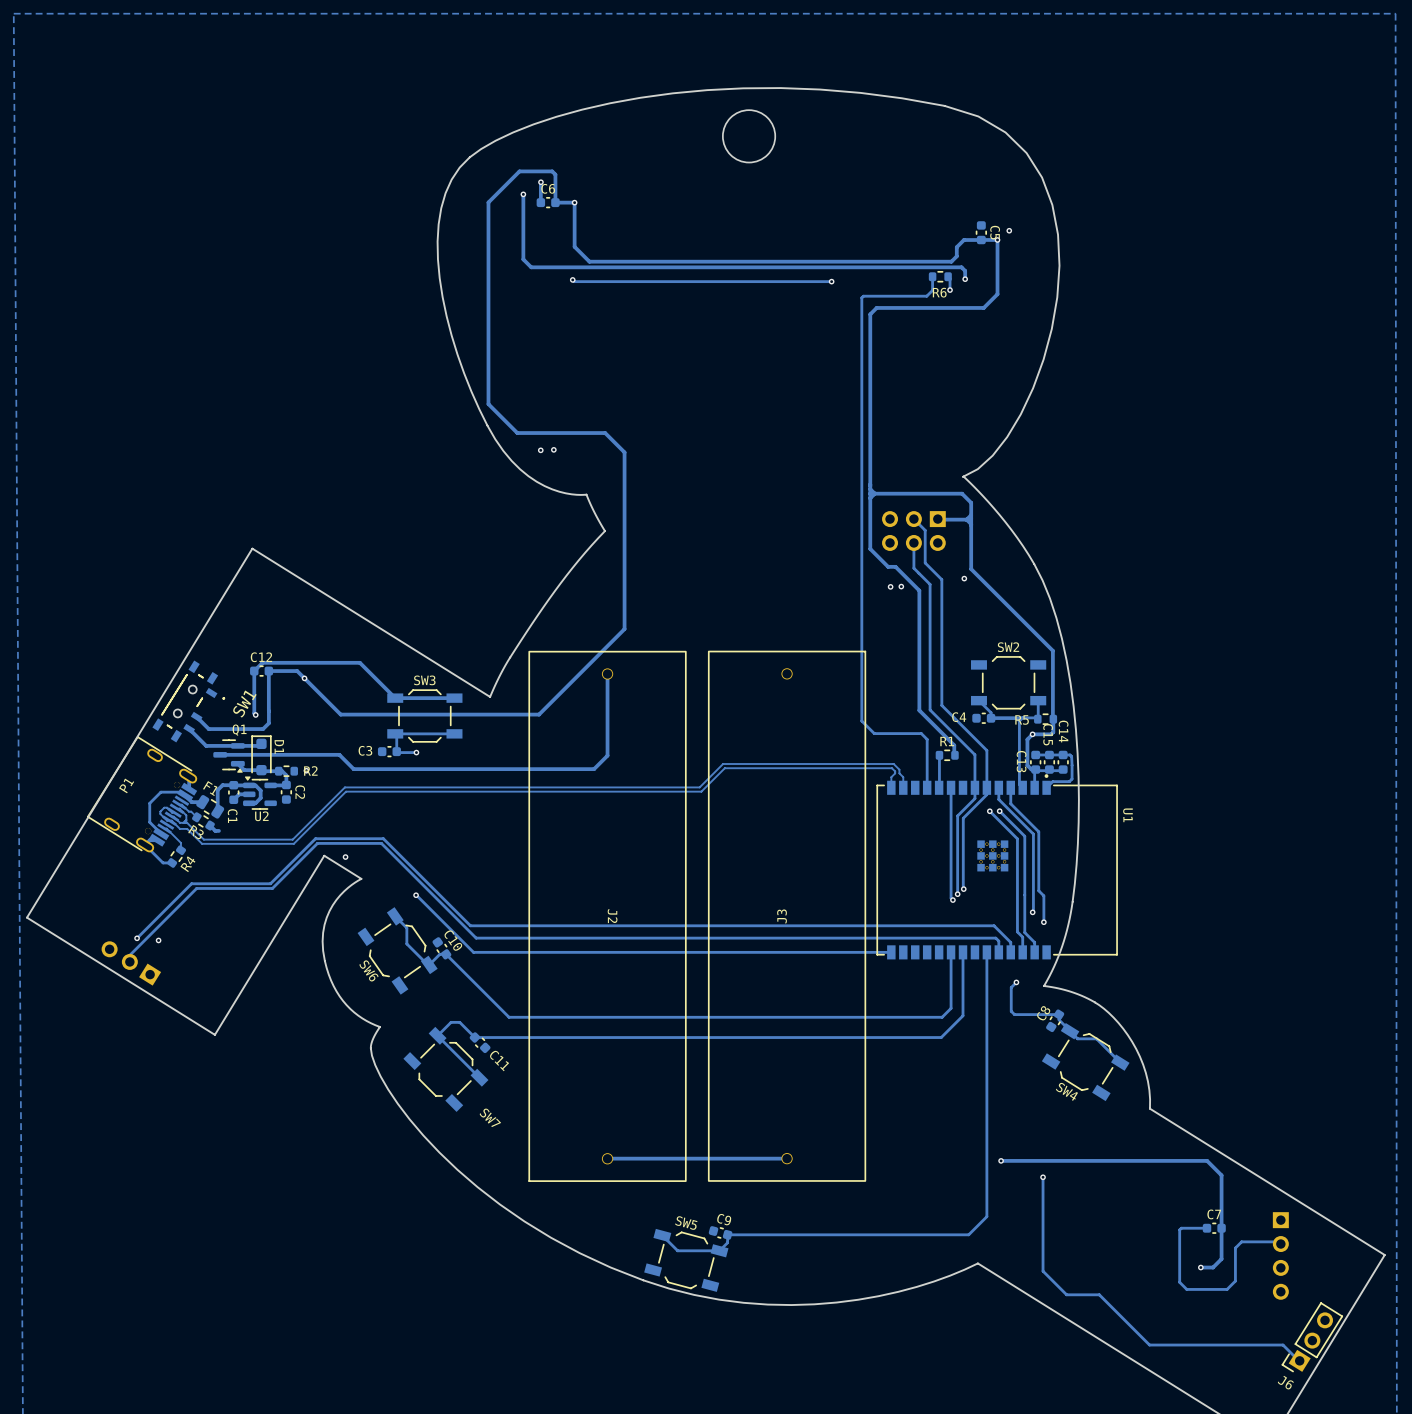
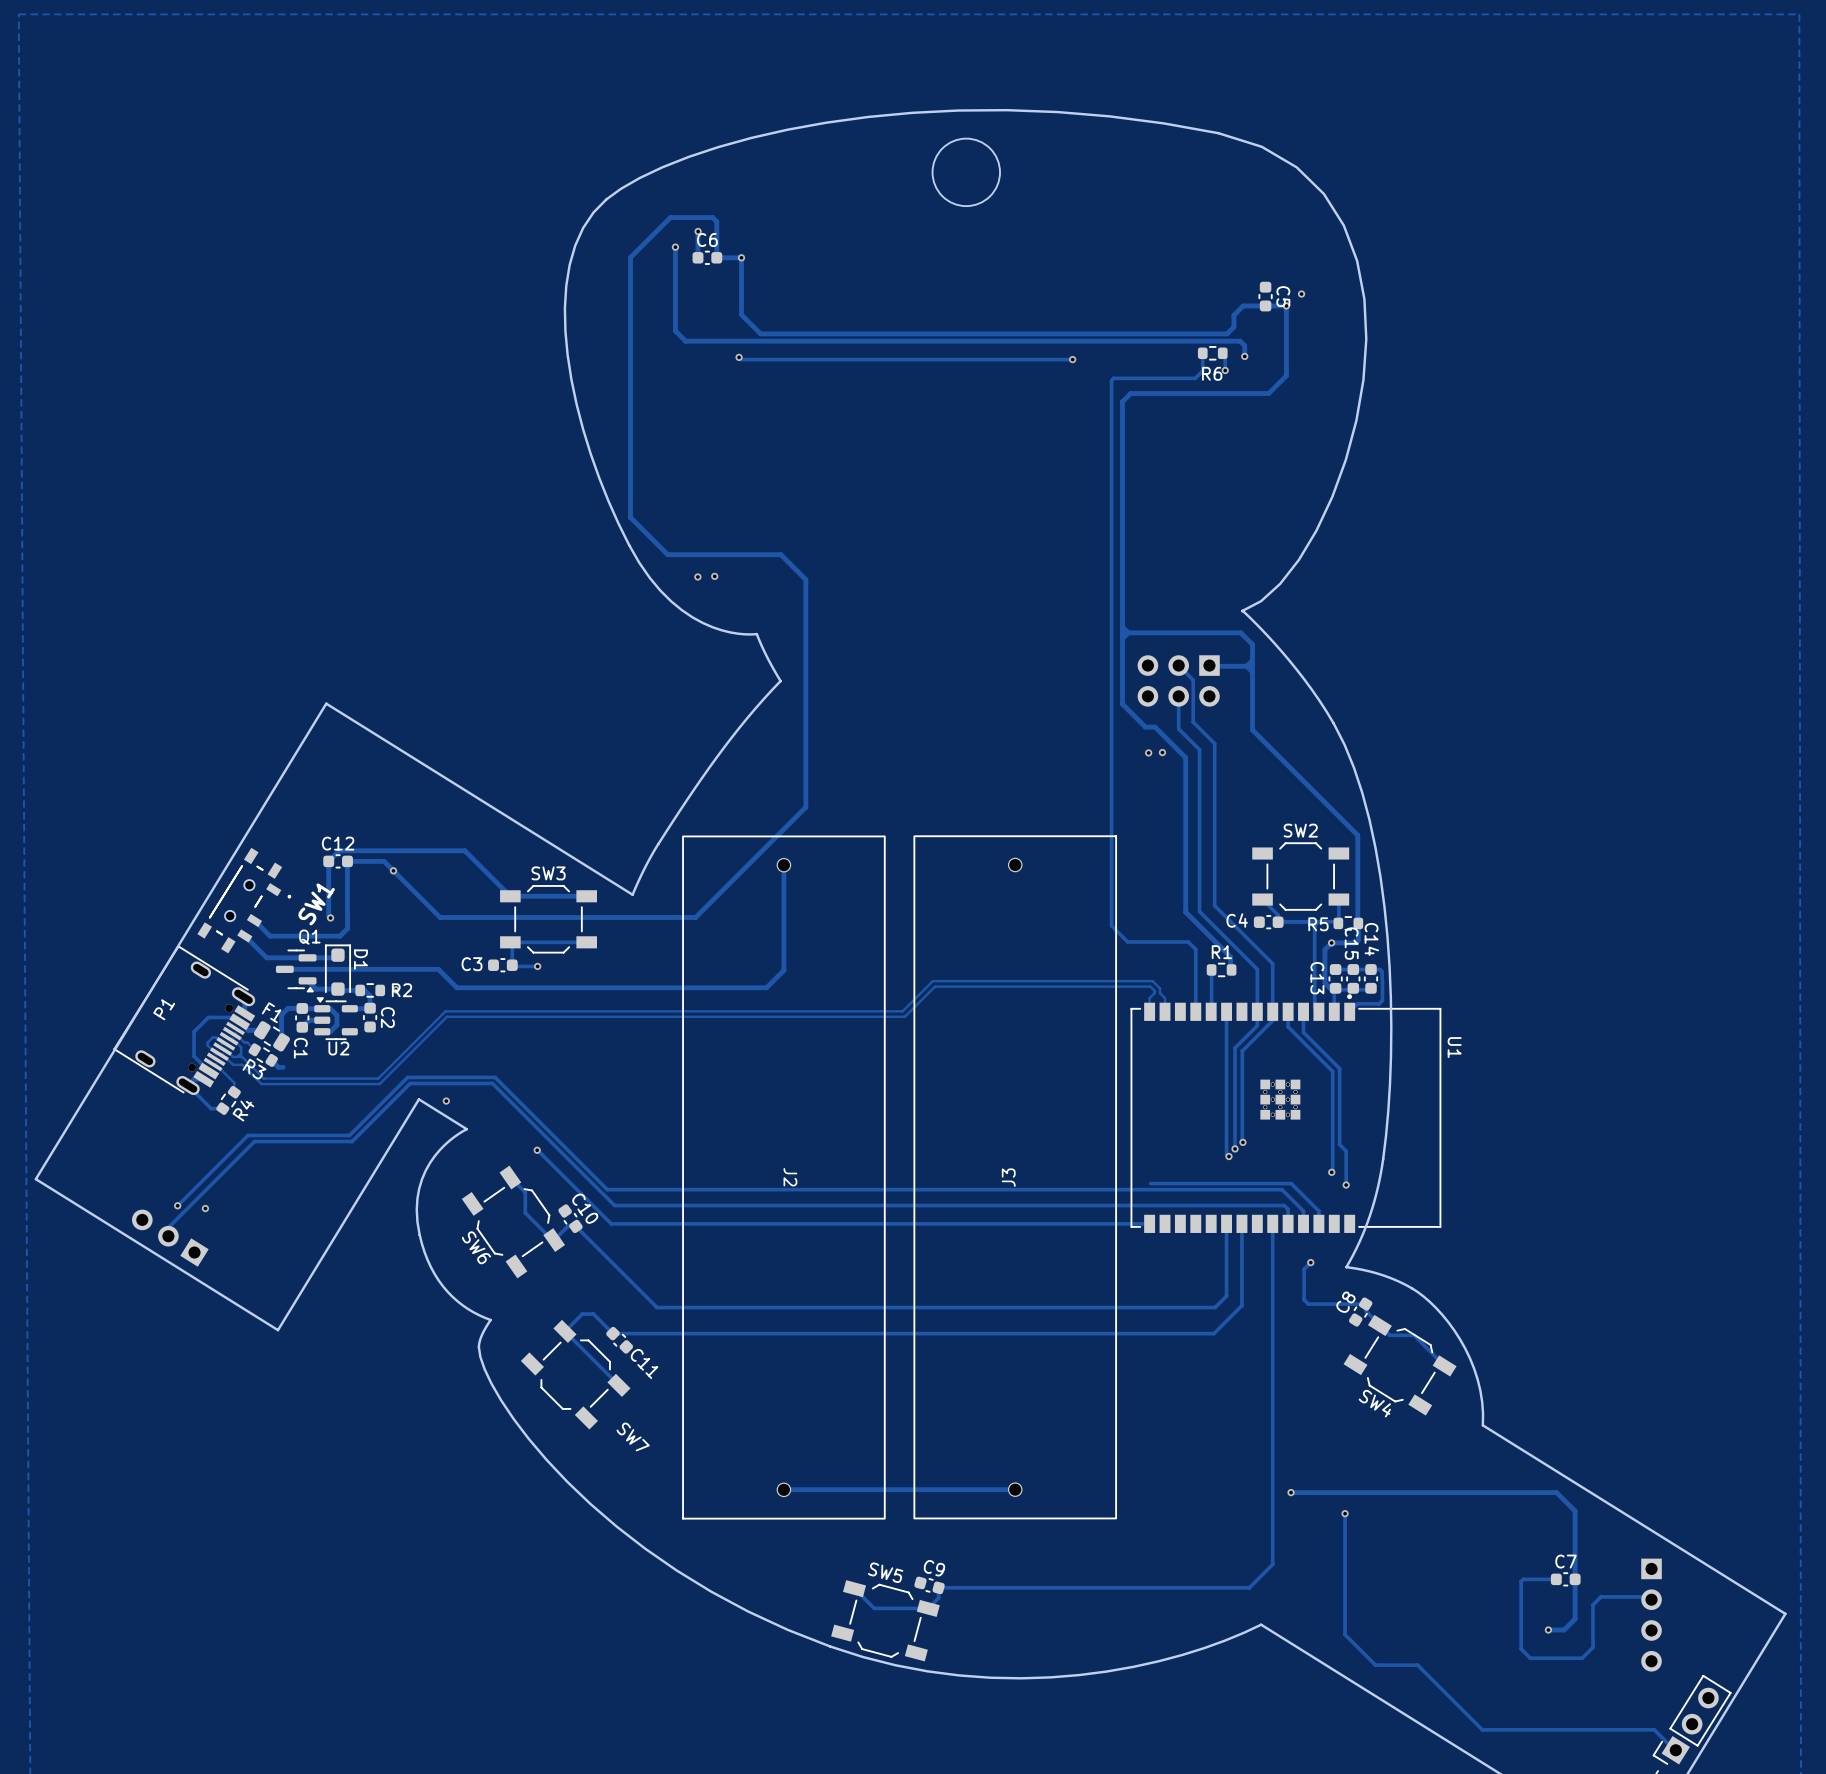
via: (964, 578) -> none
track: (989, 811) (1017, 838) (1017, 931) (1022, 937) (1022, 942) -> (1150, 1183) (1291, 1183) (1318, 1211)
via: (989, 811) -> none
track: (999, 811) (1024, 836) (1024, 932) (1034, 942) (1034, 952) -> none
via: (999, 811) -> none

